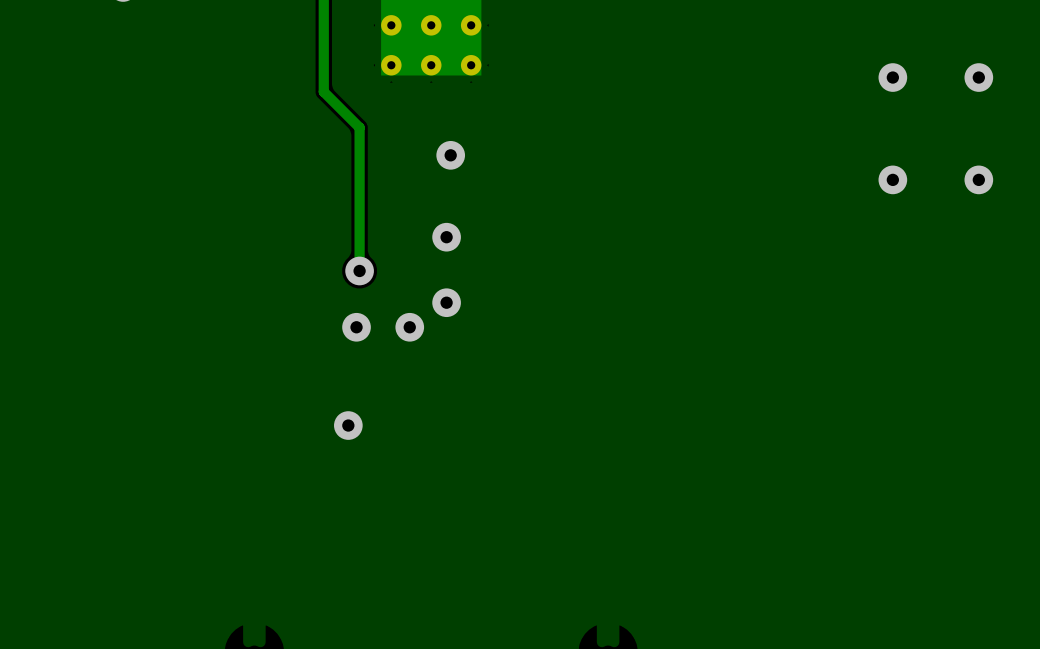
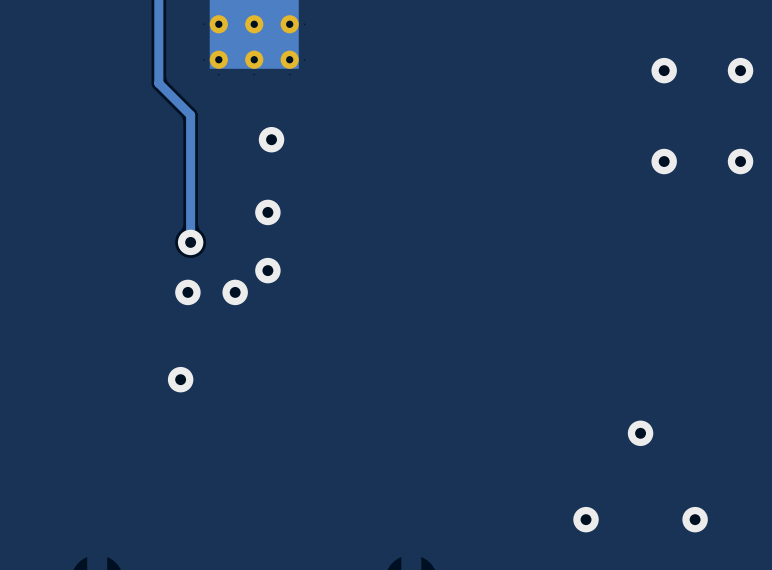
via: none -> (640, 433)
via: none -> (586, 519)
via: none -> (695, 519)

